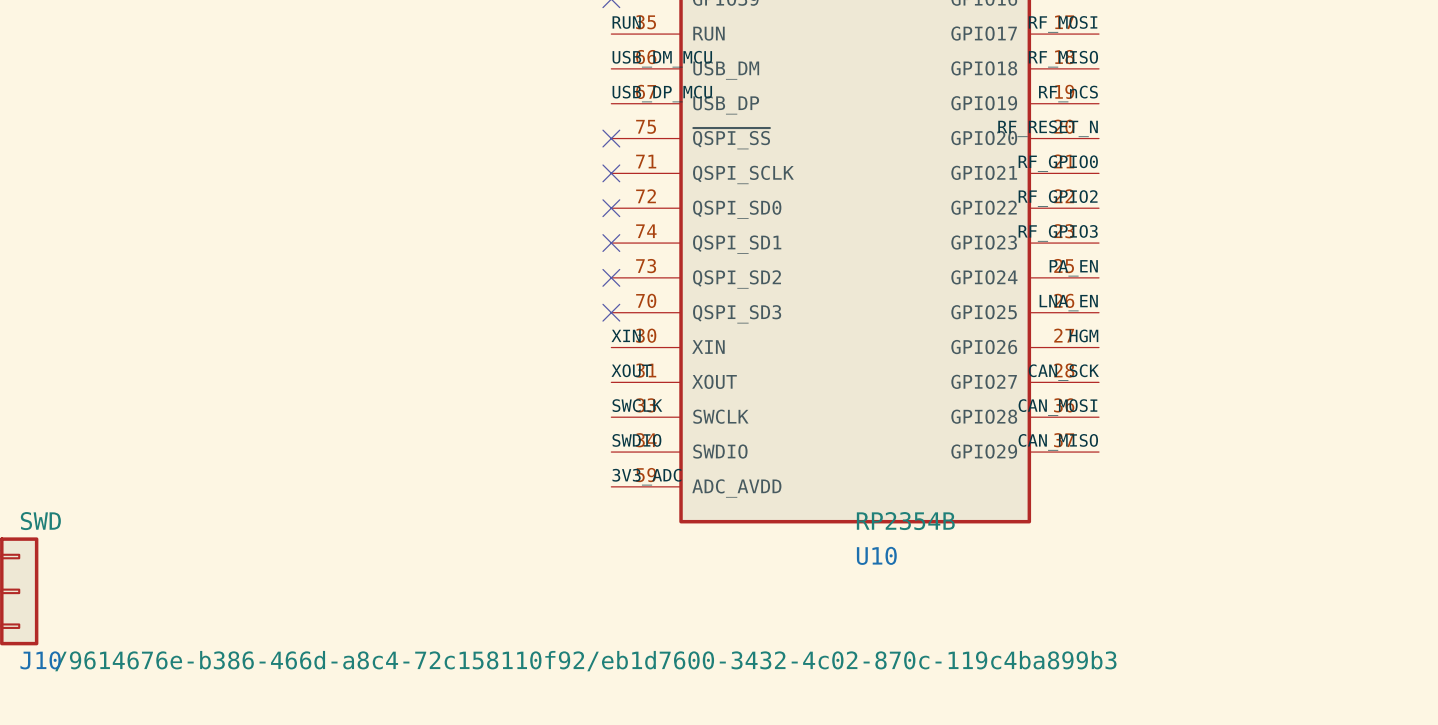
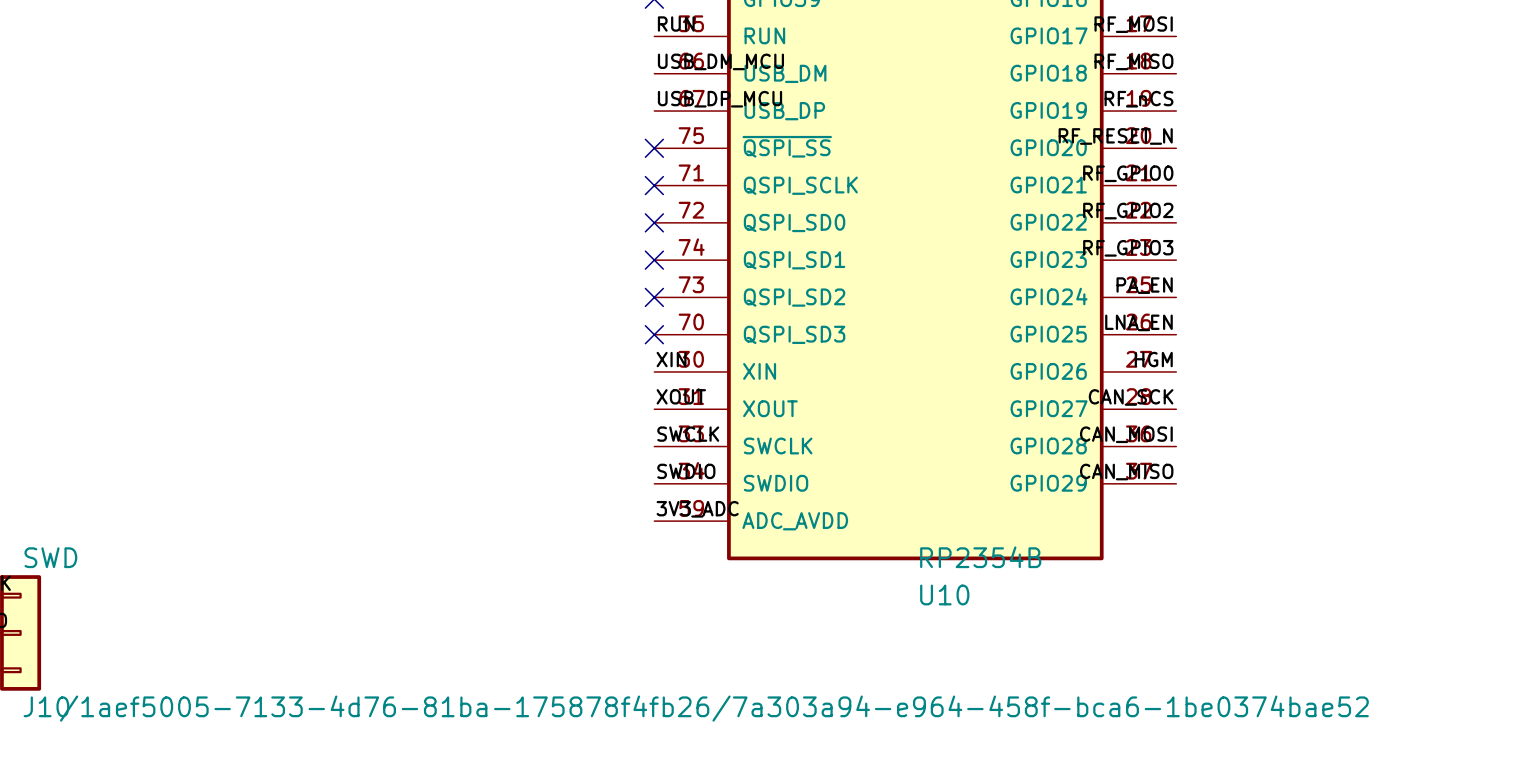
J10 text: /9614676e-b386-466d-a8c4-72c158110f92/eb1d7600-3432-4c02-870c-119c4ba899b3 (585, 661) -> /1aef5005-7133-4d76-81ba-175878f4fb26/7a303a94-e964-458f-bca6-1be0374bae52 (714, 708)

